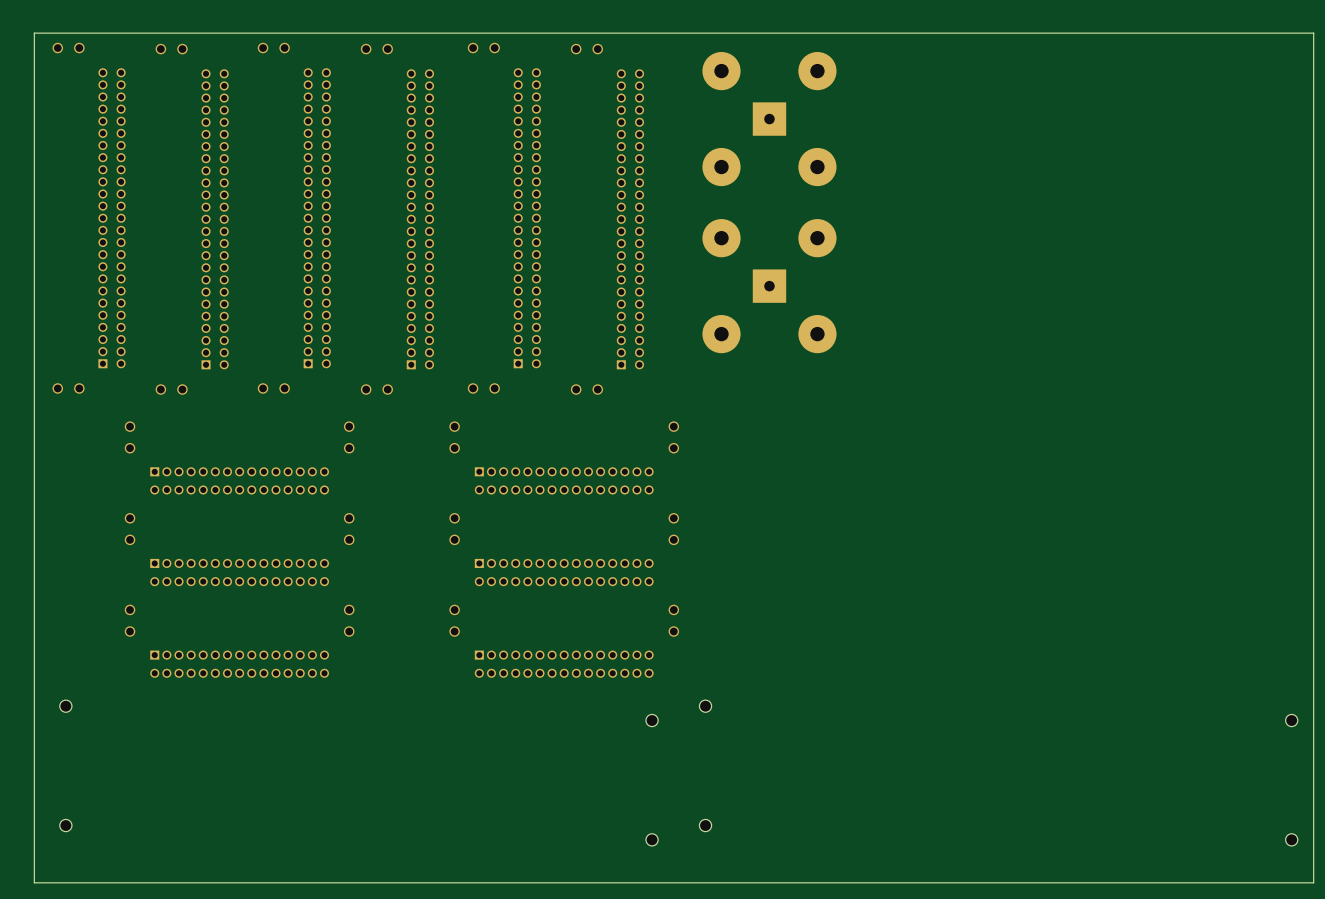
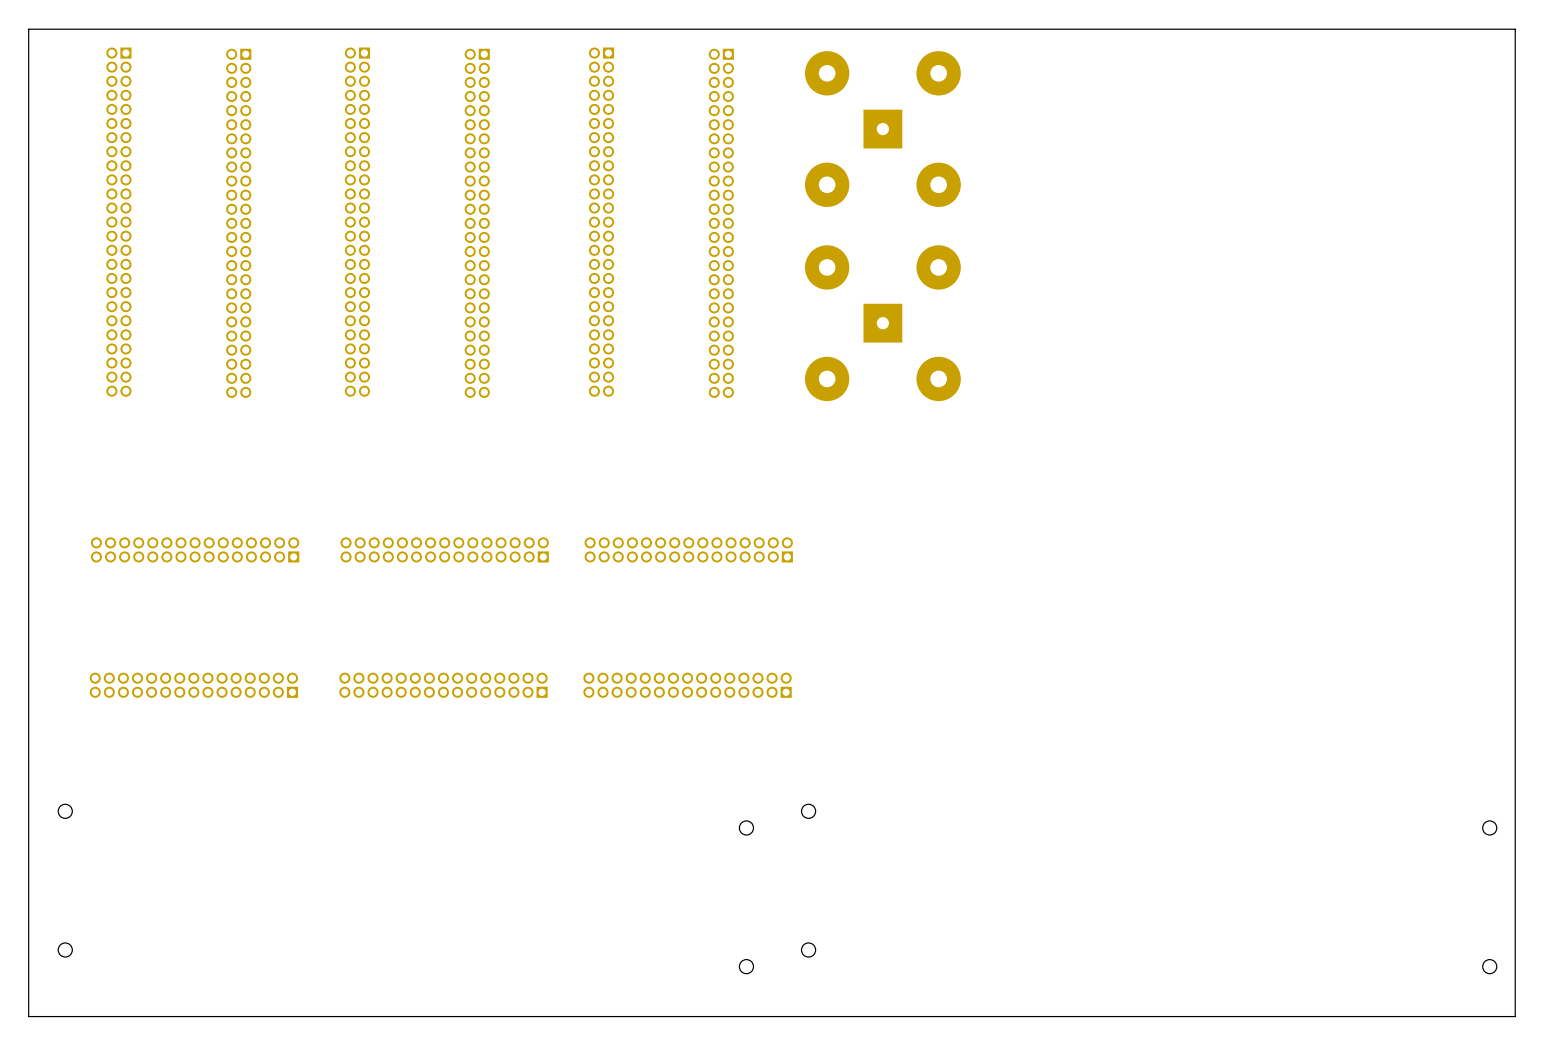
part: none -> (118, 222)
part: none -> (357, 222)
part: none -> (601, 222)
part: none -> (238, 223)
part: none -> (477, 223)
part: none -> (721, 223)
part: (89, 218) -> none
part: (294, 218) -> none
part: (504, 218) -> none
part: (192, 219) -> none
part: (397, 219) -> none
part: (607, 219) -> none
part: (239, 457) -> none
part: (564, 457) -> none
part: none -> (195, 549)
part: none -> (444, 549)
part: none -> (688, 549)
part: (239, 549) -> none
part: (564, 549) -> none
part: none -> (193, 685)
part: none -> (443, 685)
part: none -> (687, 685)
part: (239, 641) -> none
part: (564, 641) -> none

